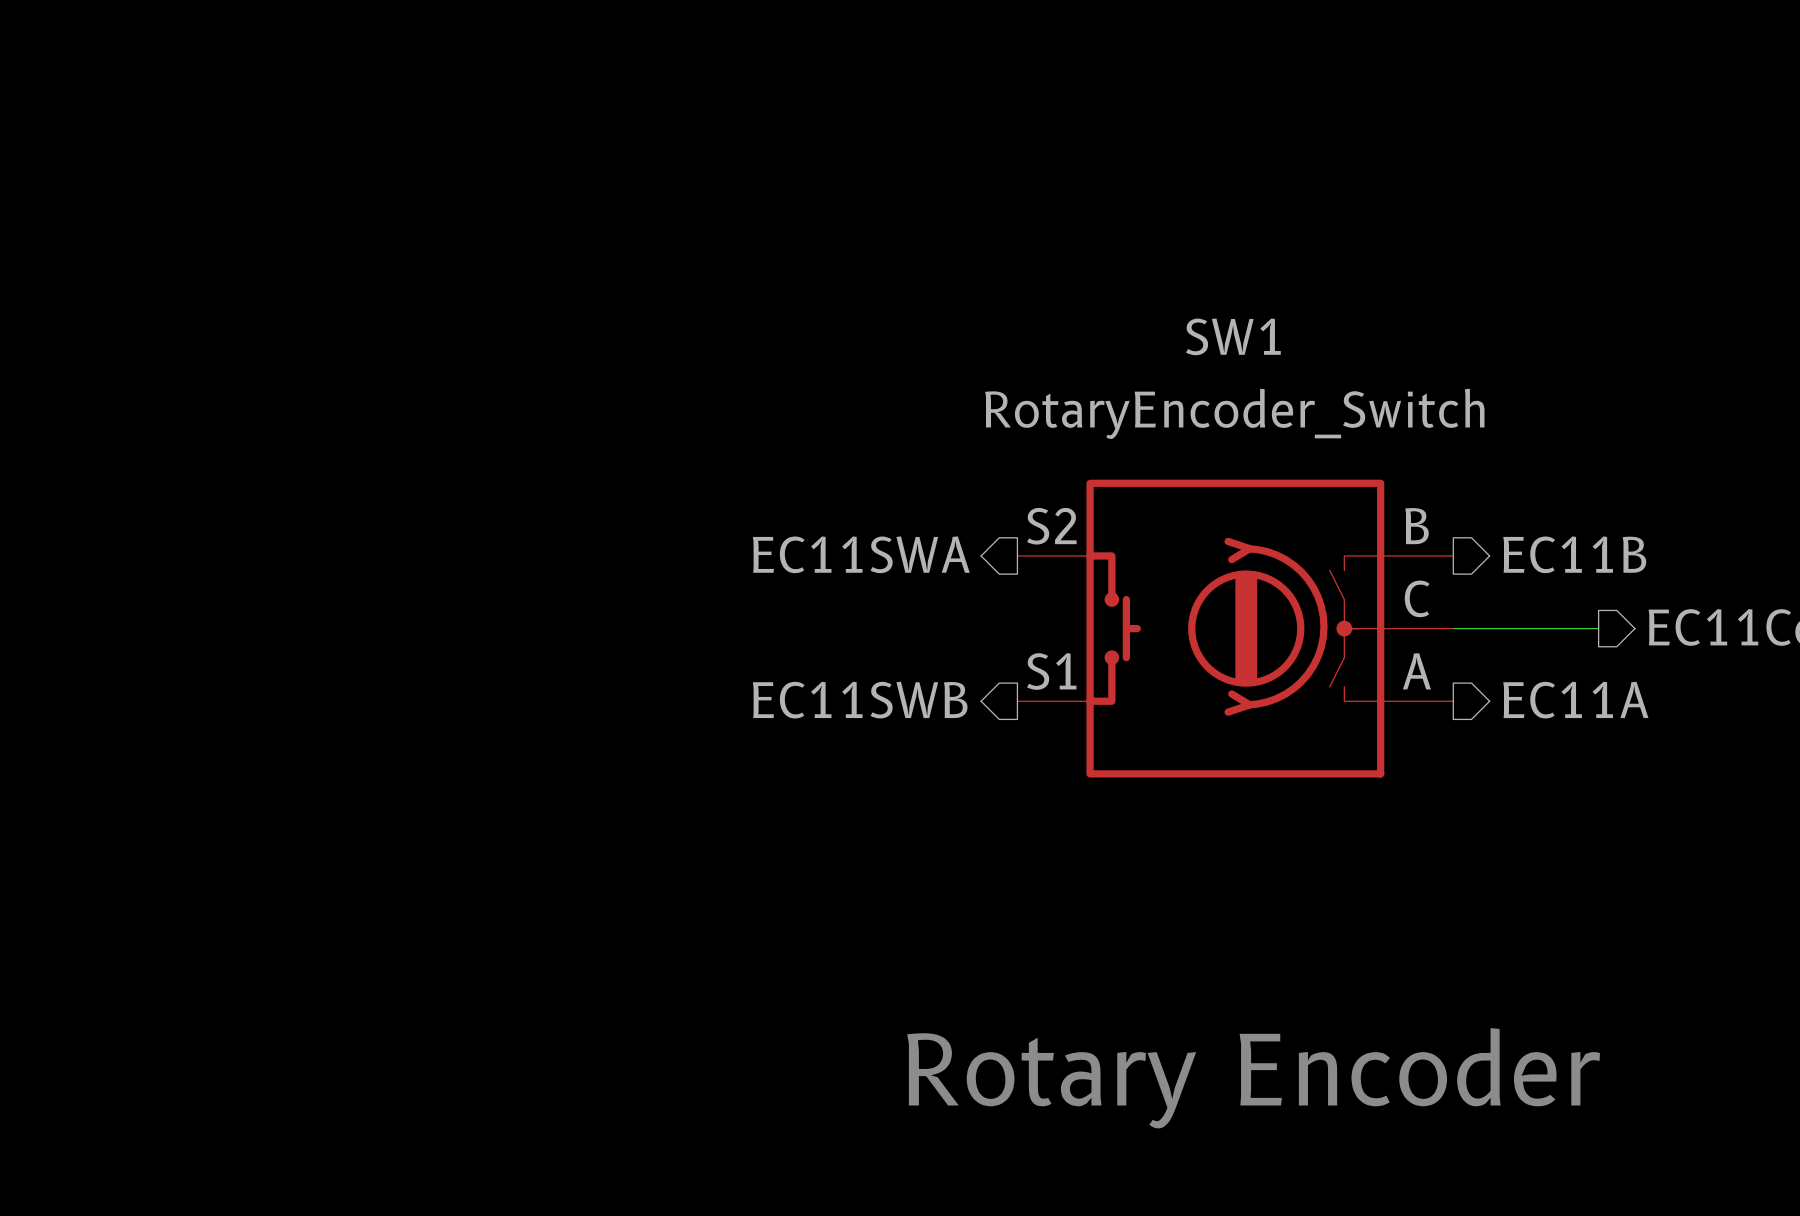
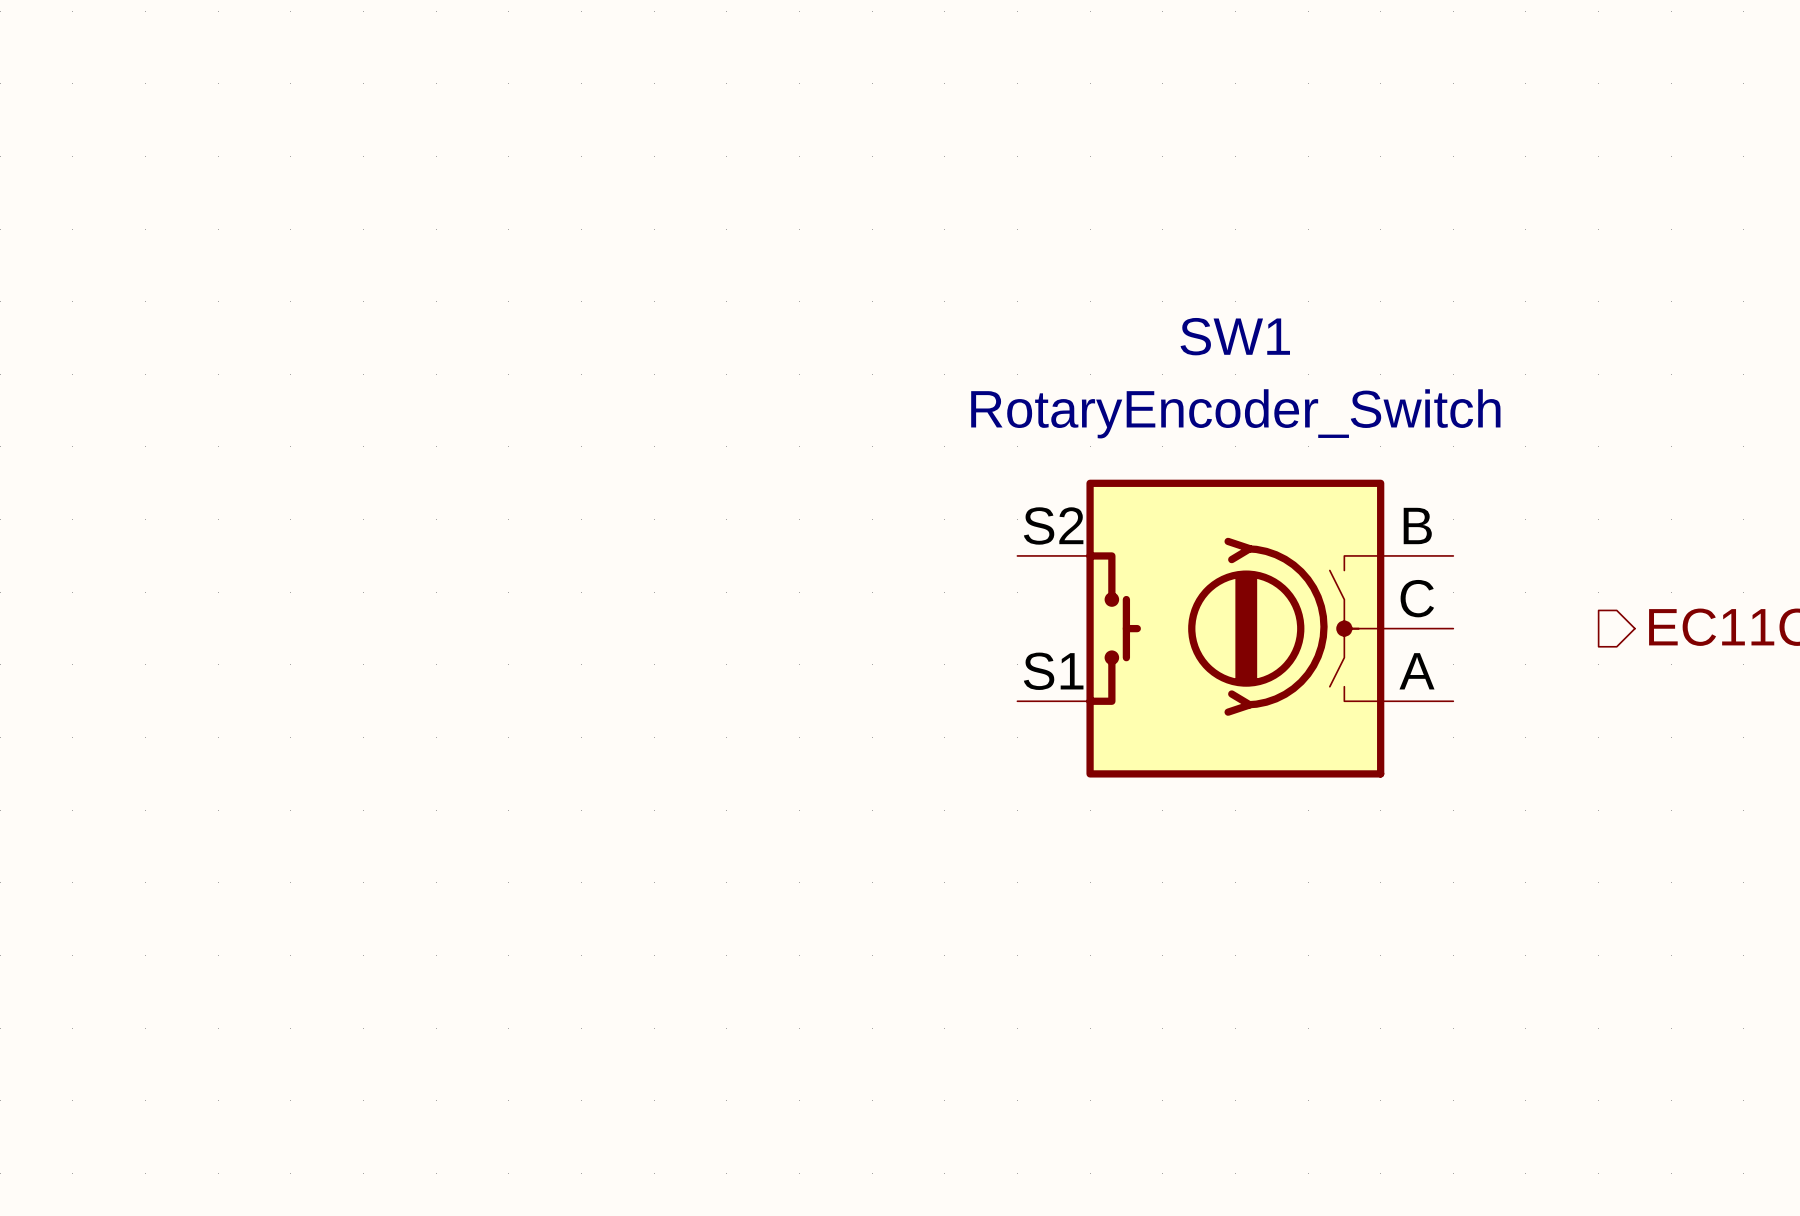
hierarchical label: EC11SWA (861, 554) -> none
hierarchical label: EC11B (1574, 554) -> none
wire: (1453, 628) (1598, 628) -> none
hierarchical label: EC11SWB (860, 700) -> none
hierarchical label: EC11A (1575, 700) -> none
text: Rotary Encoder (1253, 1078) -> none

